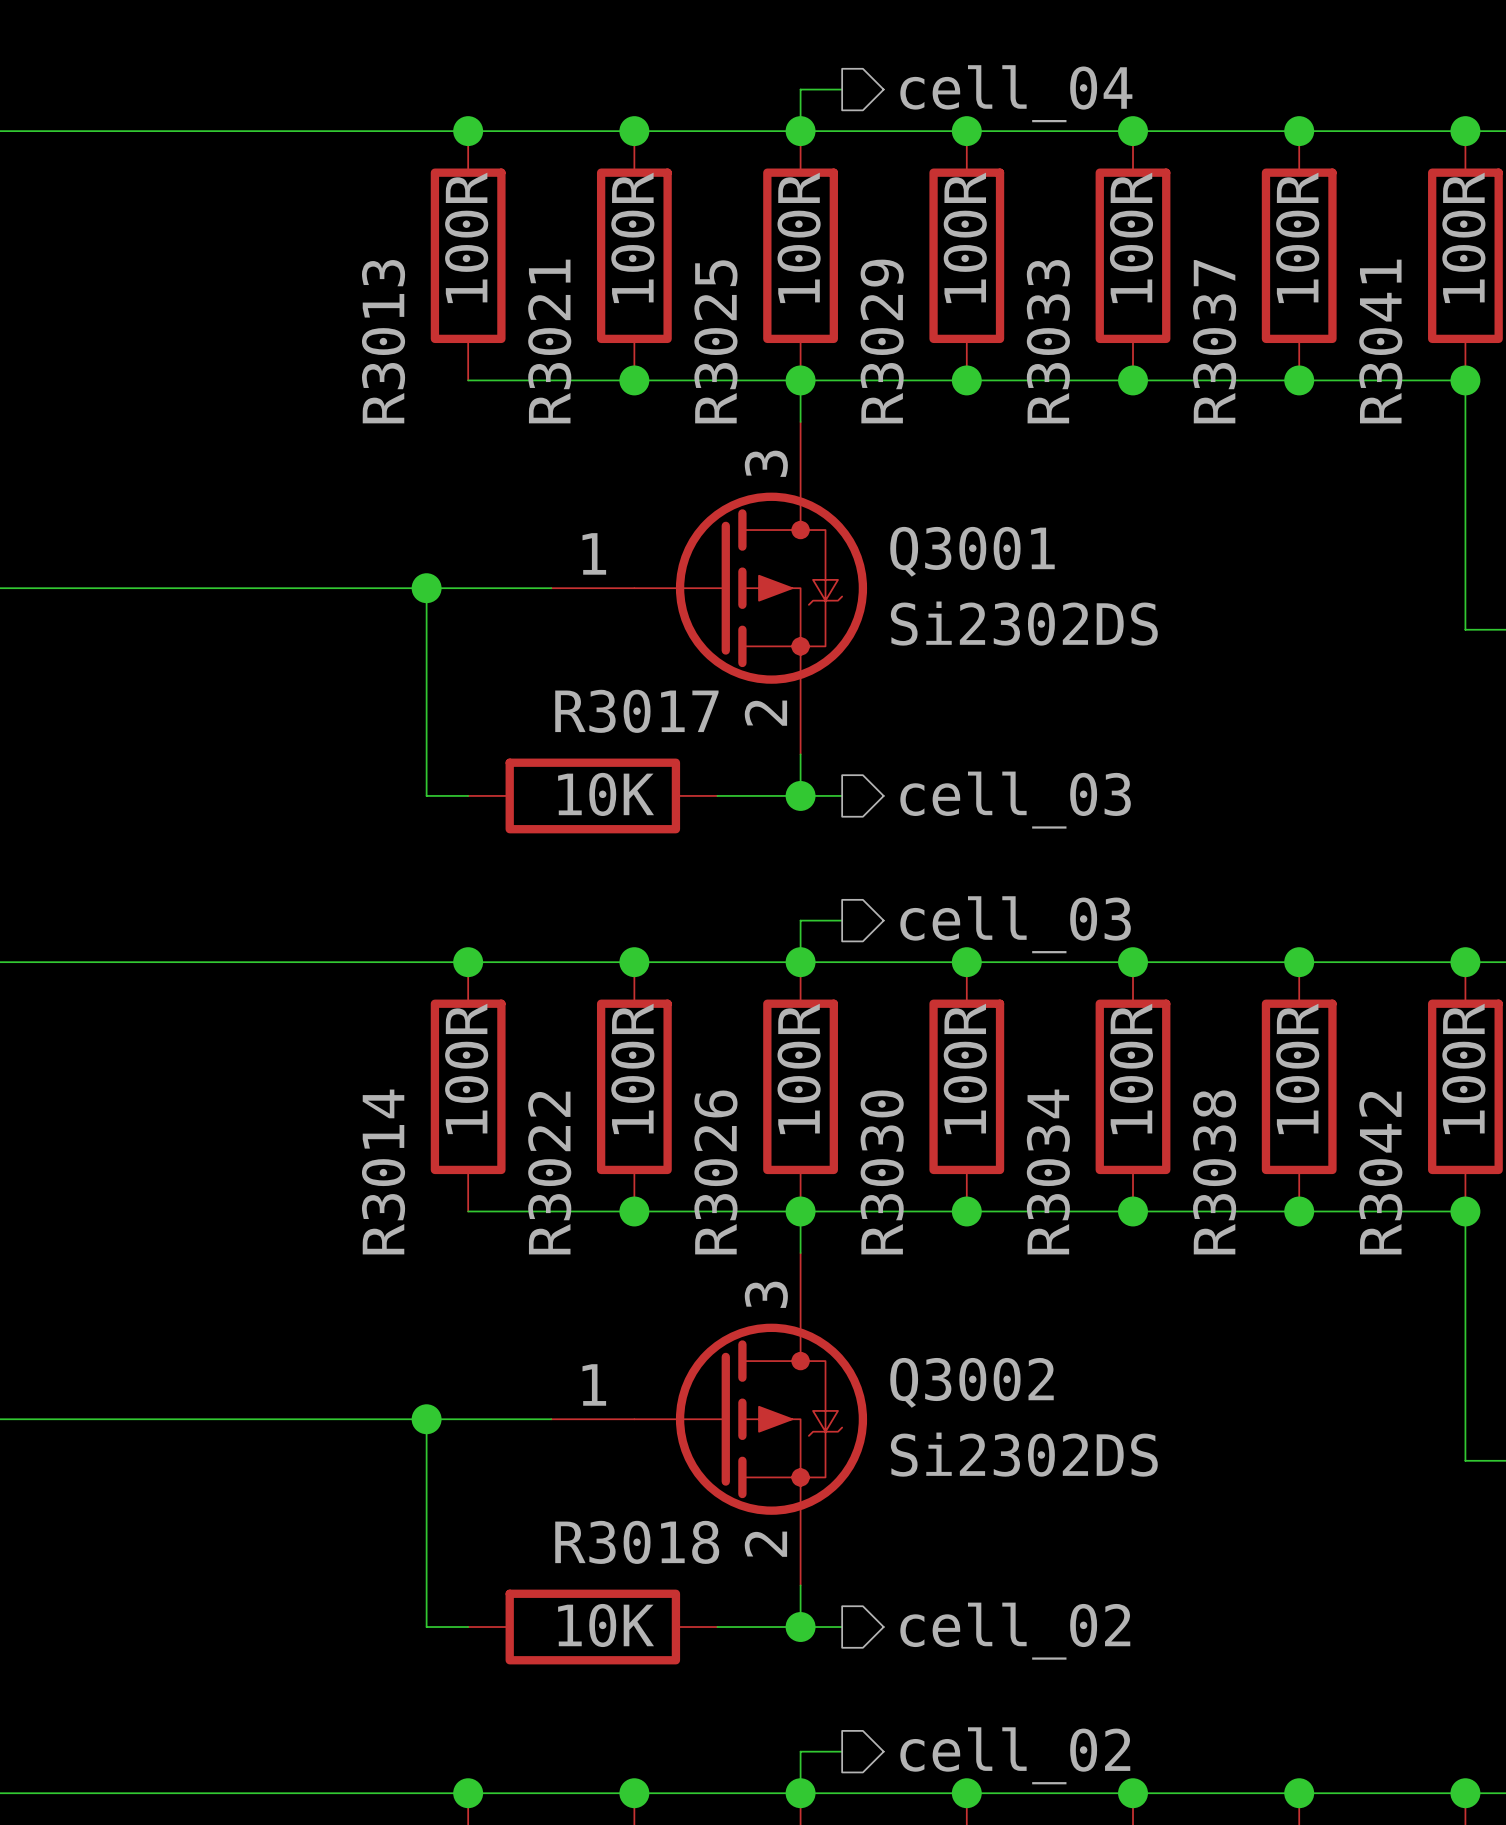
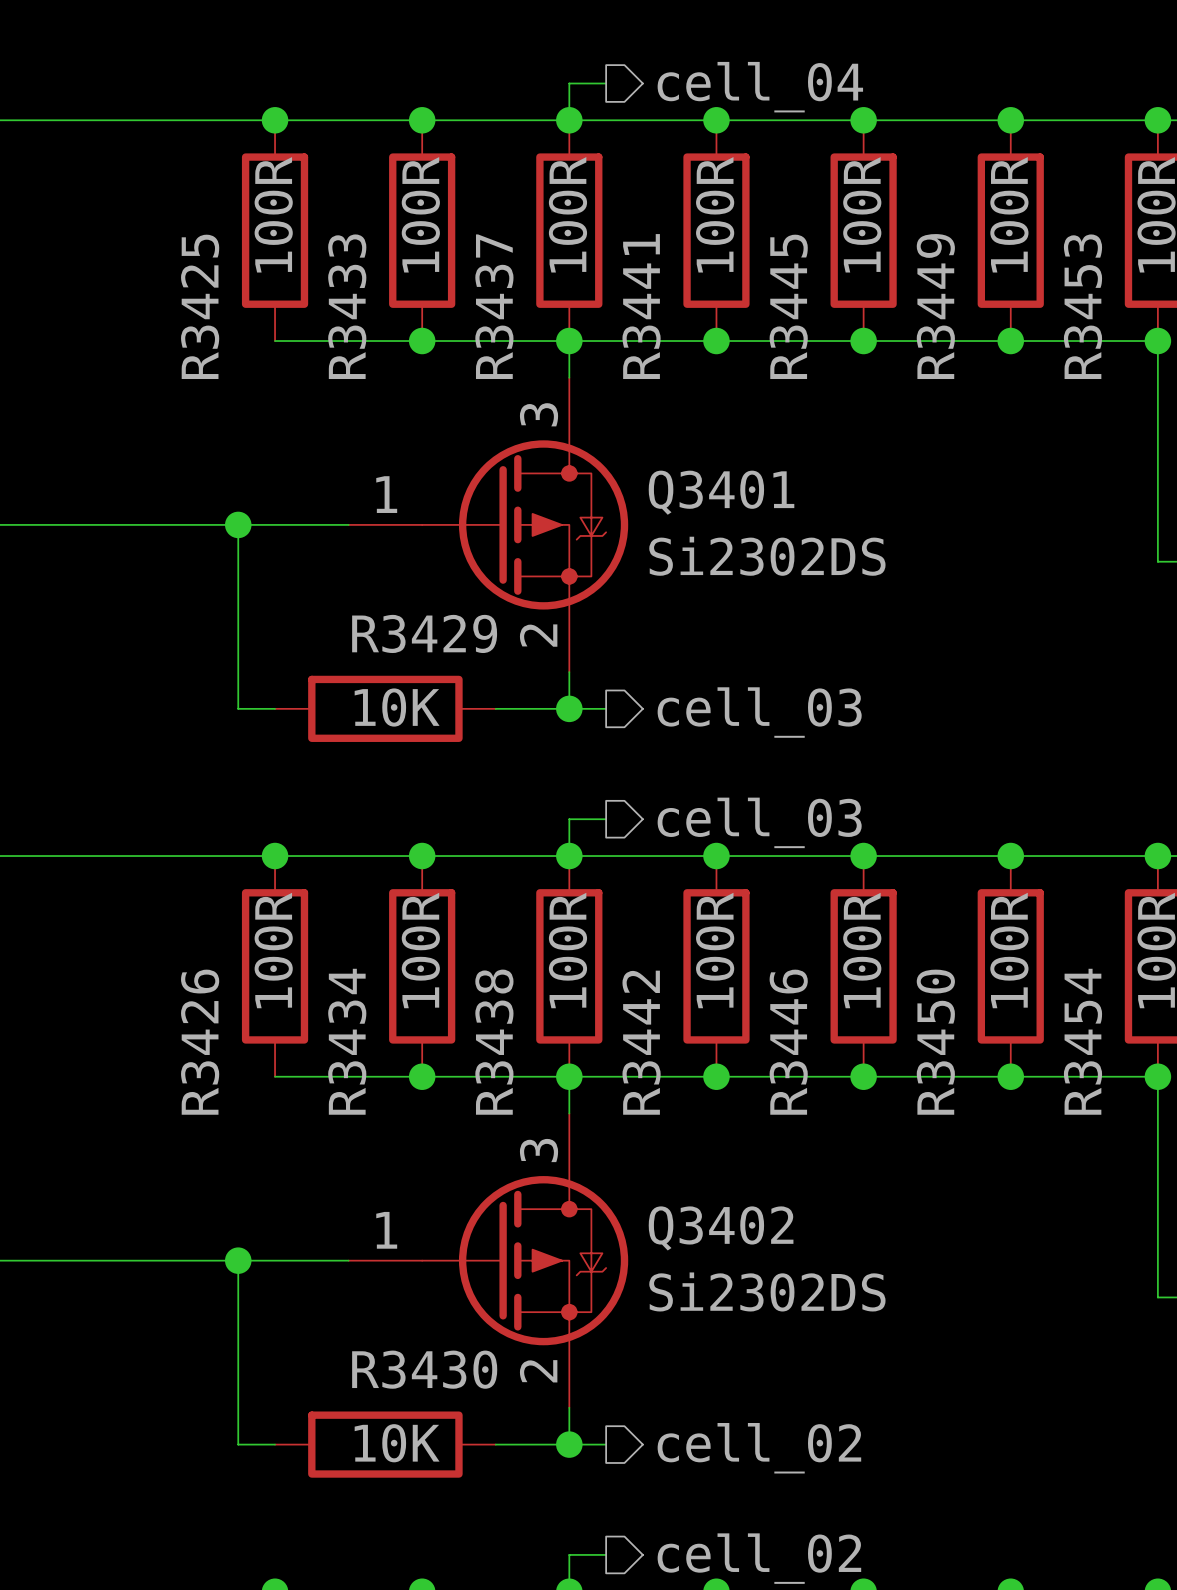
R3013 name: R3013 (383, 341) -> R3425 (200, 306)
R3021 name: R3021 (549, 341) -> R3433 (347, 306)
R3025 name: R3025 (715, 341) -> R3437 (494, 306)
R3029 name: R3029 (882, 341) -> R3441 (641, 306)
R3033 name: R3033 (1048, 341) -> R3445 (788, 306)
R3037 name: R3037 (1214, 341) -> R3449 (935, 306)
R3041 name: R3041 (1380, 341) -> R3453 (1082, 306)
Q3001 name: Q3001 (972, 551) -> Q3401 (721, 492)
R3017 name: R3017 (636, 711) -> R3429 (424, 633)
R3014 name: R3014 (383, 1171) -> R3426 (200, 1042)
R3034 name: R3034 (1048, 1171) -> R3446 (788, 1042)
R3026 name: R3026 (715, 1172) -> R3438 (494, 1042)
R3030 name: R3030 (882, 1172) -> R3442 (641, 1042)
R3038 name: R3038 (1214, 1172) -> R3450 (935, 1042)
R3022 name: R3022 (549, 1173) -> R3434 (347, 1041)
R3042 name: R3042 (1380, 1173) -> R3454 (1082, 1041)
Q3002 name: Q3002 (972, 1382) -> Q3402 (721, 1228)
R3018 name: R3018 (637, 1542) -> R3430 (424, 1369)

